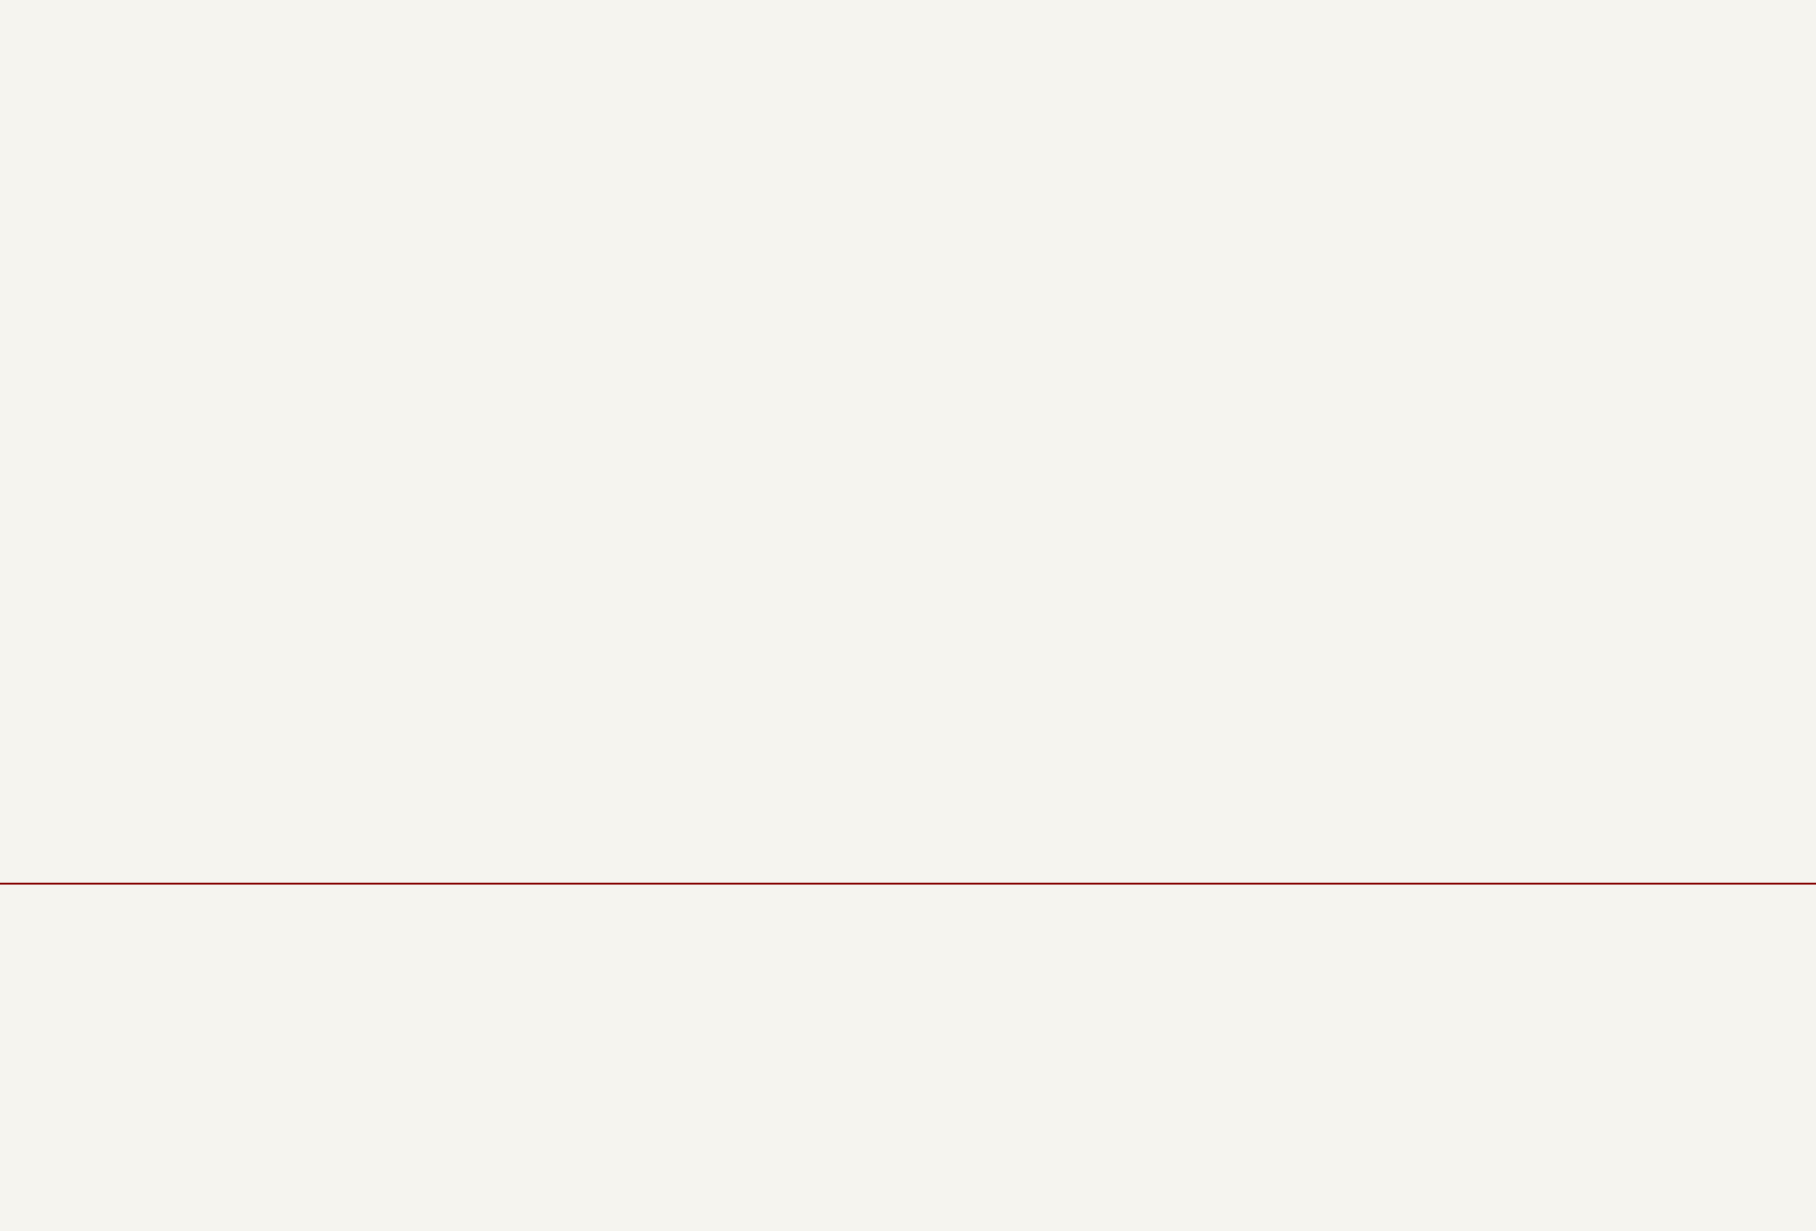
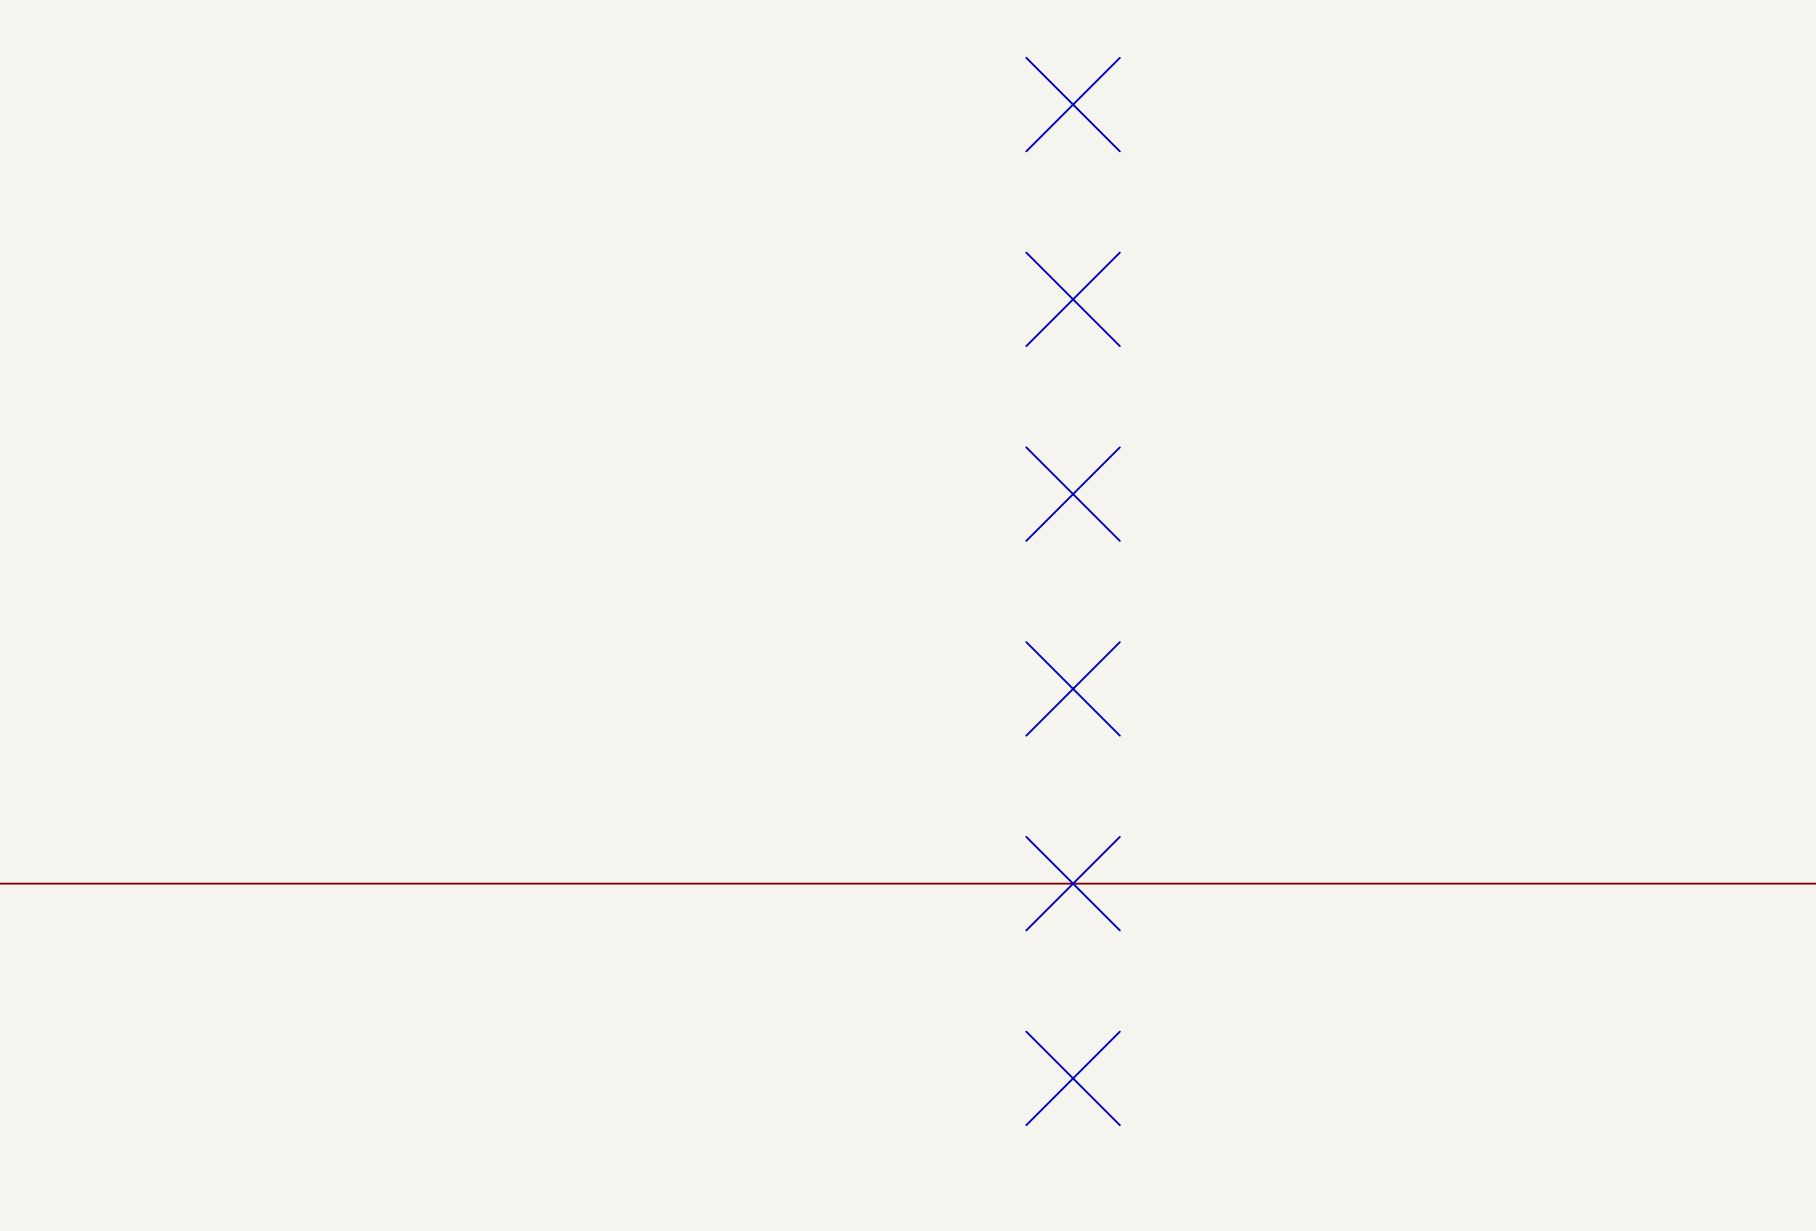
no-connect mark: none -> (1073, 104)
no-connect mark: none -> (1073, 299)
no-connect mark: none -> (1073, 494)
no-connect mark: none -> (1073, 688)
no-connect mark: none -> (1073, 883)
no-connect mark: none -> (1073, 1078)

